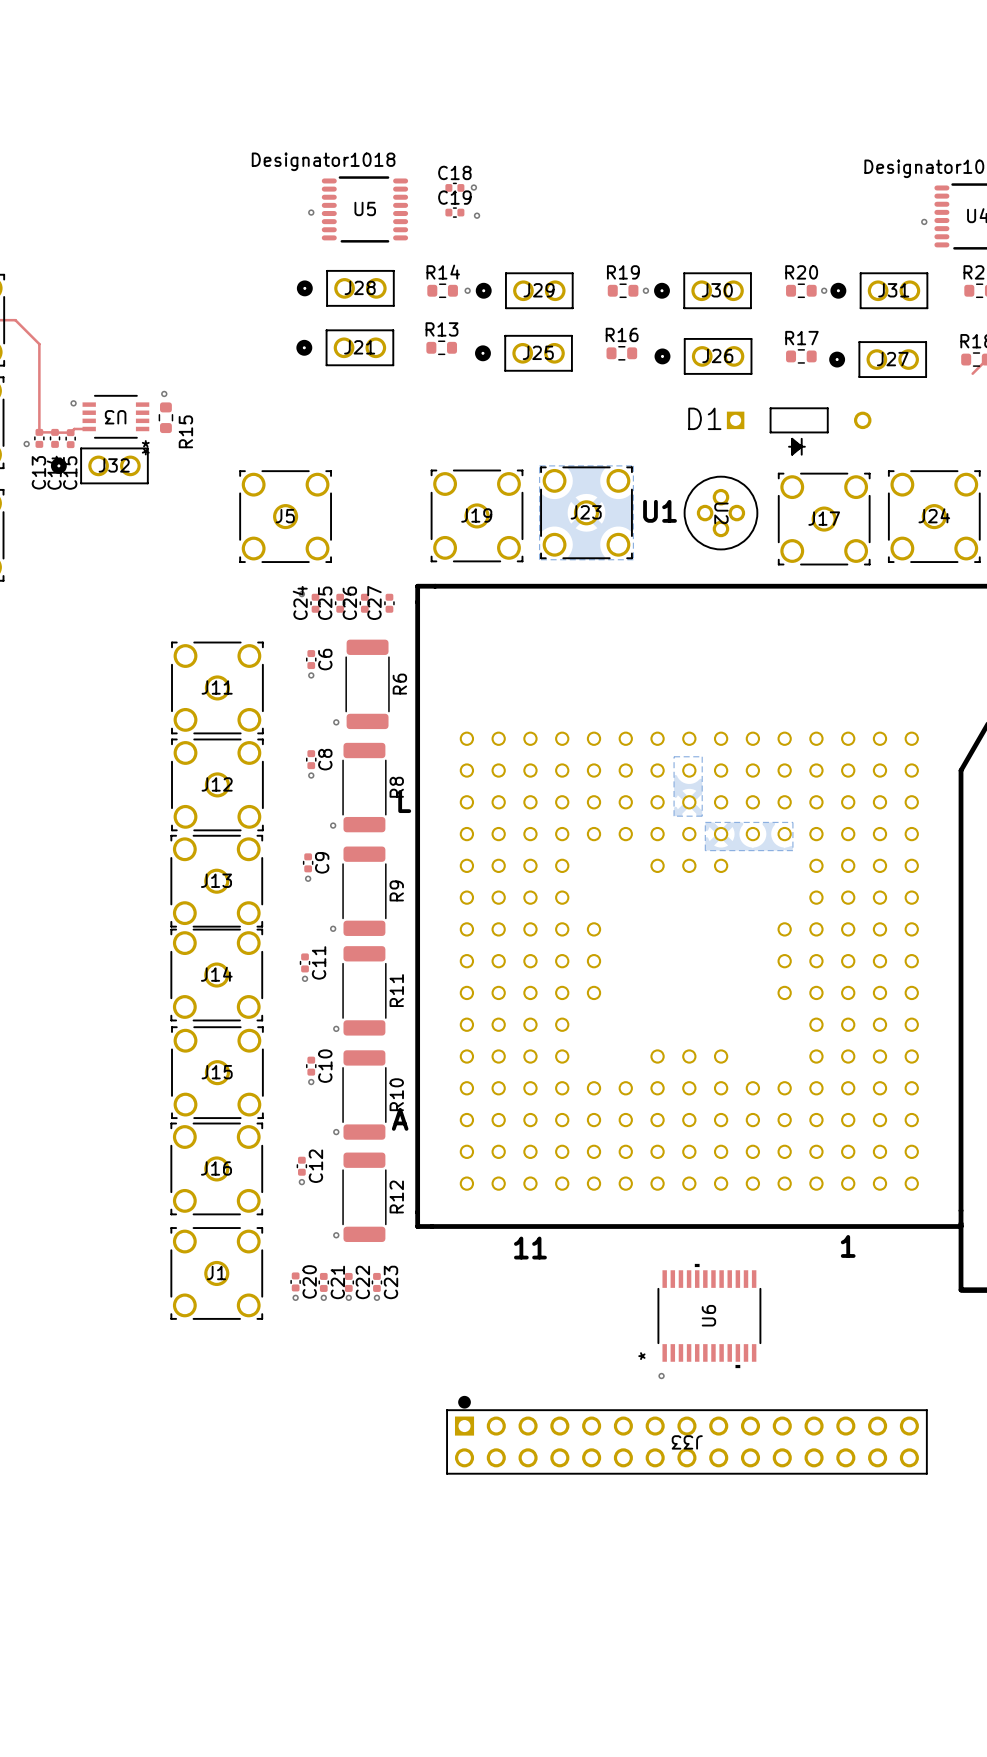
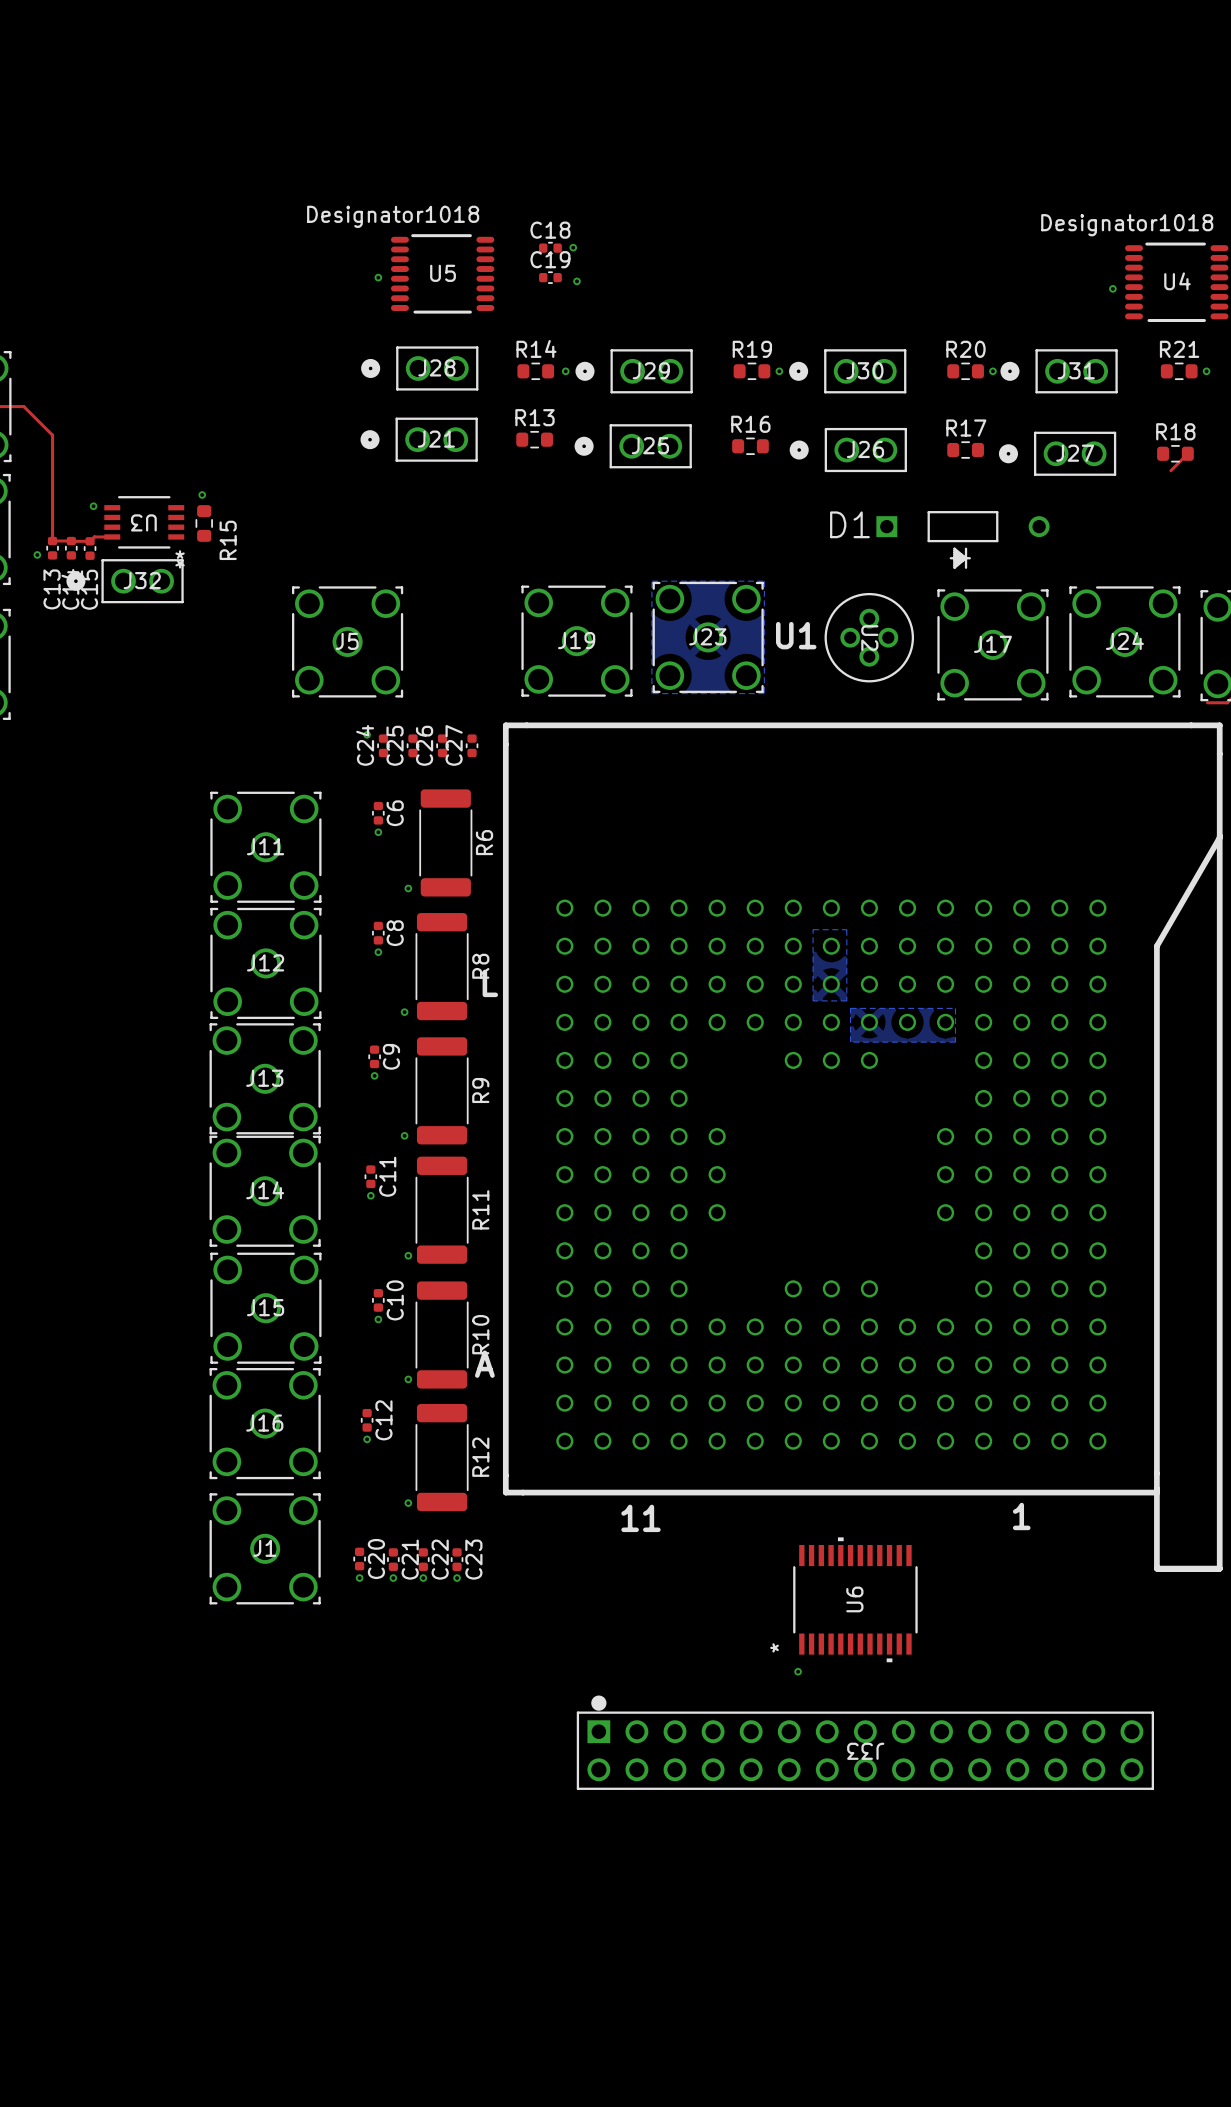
J33 position: (686, 1435) -> (865, 1742)

